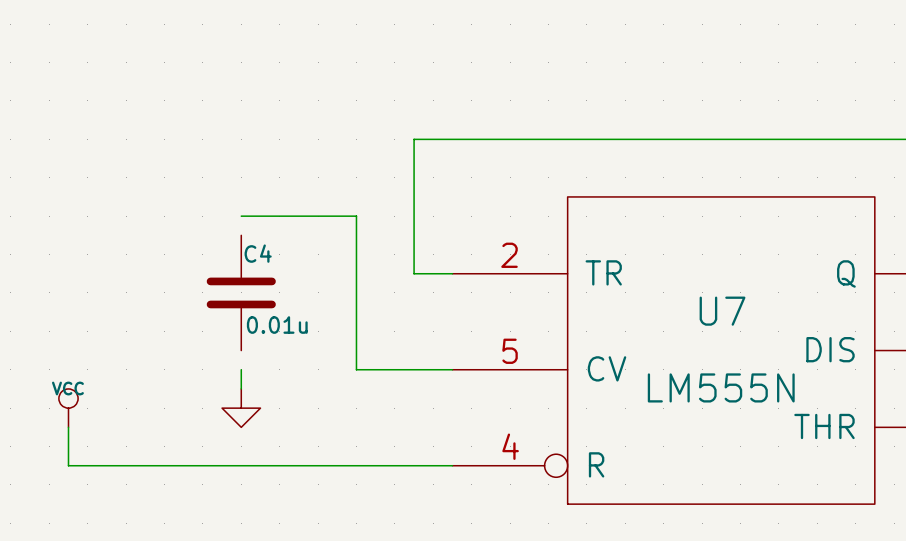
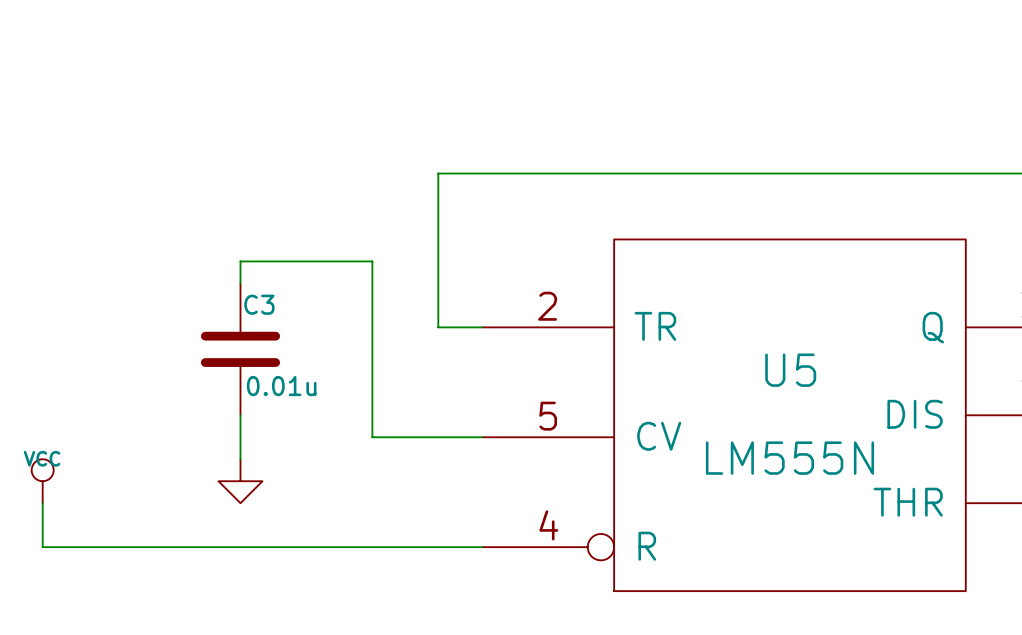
wire: none -> (240, 261) (240, 283)
C4 name: C4 (258, 253) -> C3 (259, 304)
U7 name: U7 (722, 311) -> U5 (790, 370)
wire: none -> (240, 415) (240, 437)

